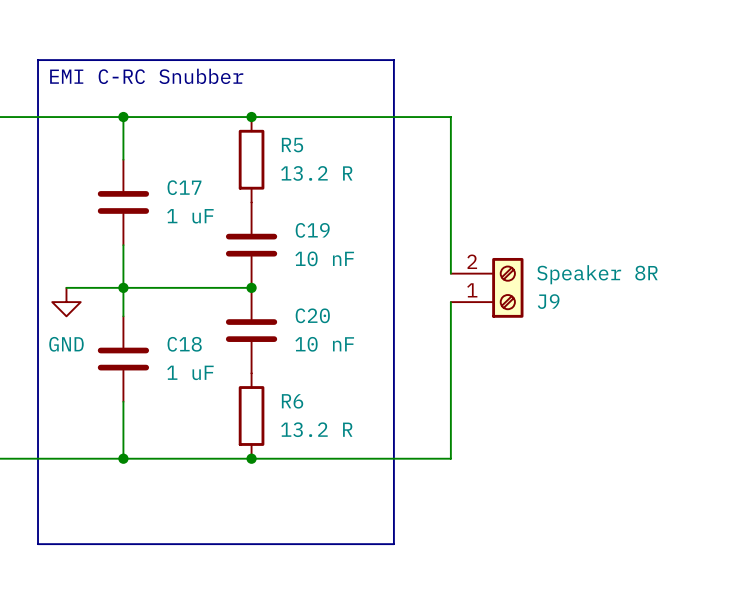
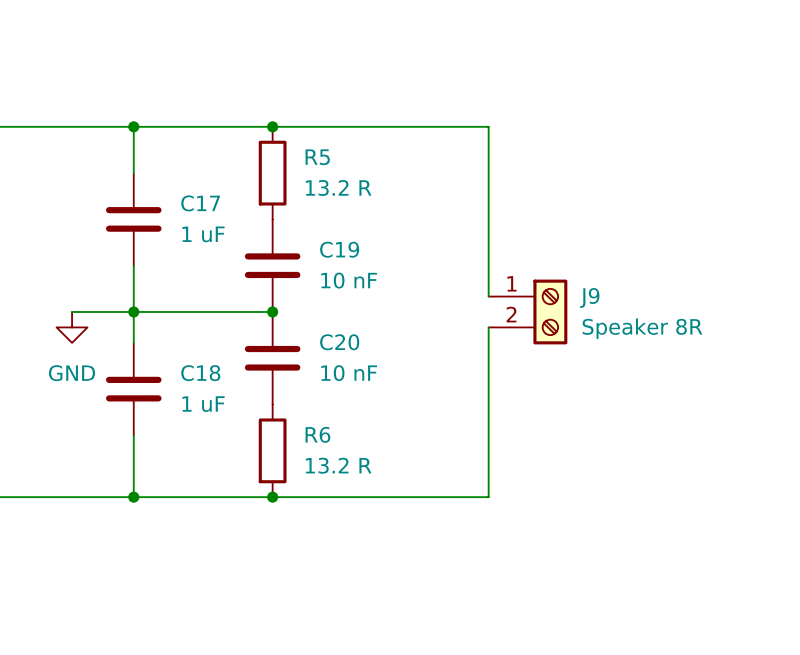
line: (38, 60) (393, 60) (393, 544) (38, 544) (38, 60) -> none
text: EMI C-RC Snubber (146, 76) -> none
J9 flip: as is (507, 287) -> up-down (550, 311)

